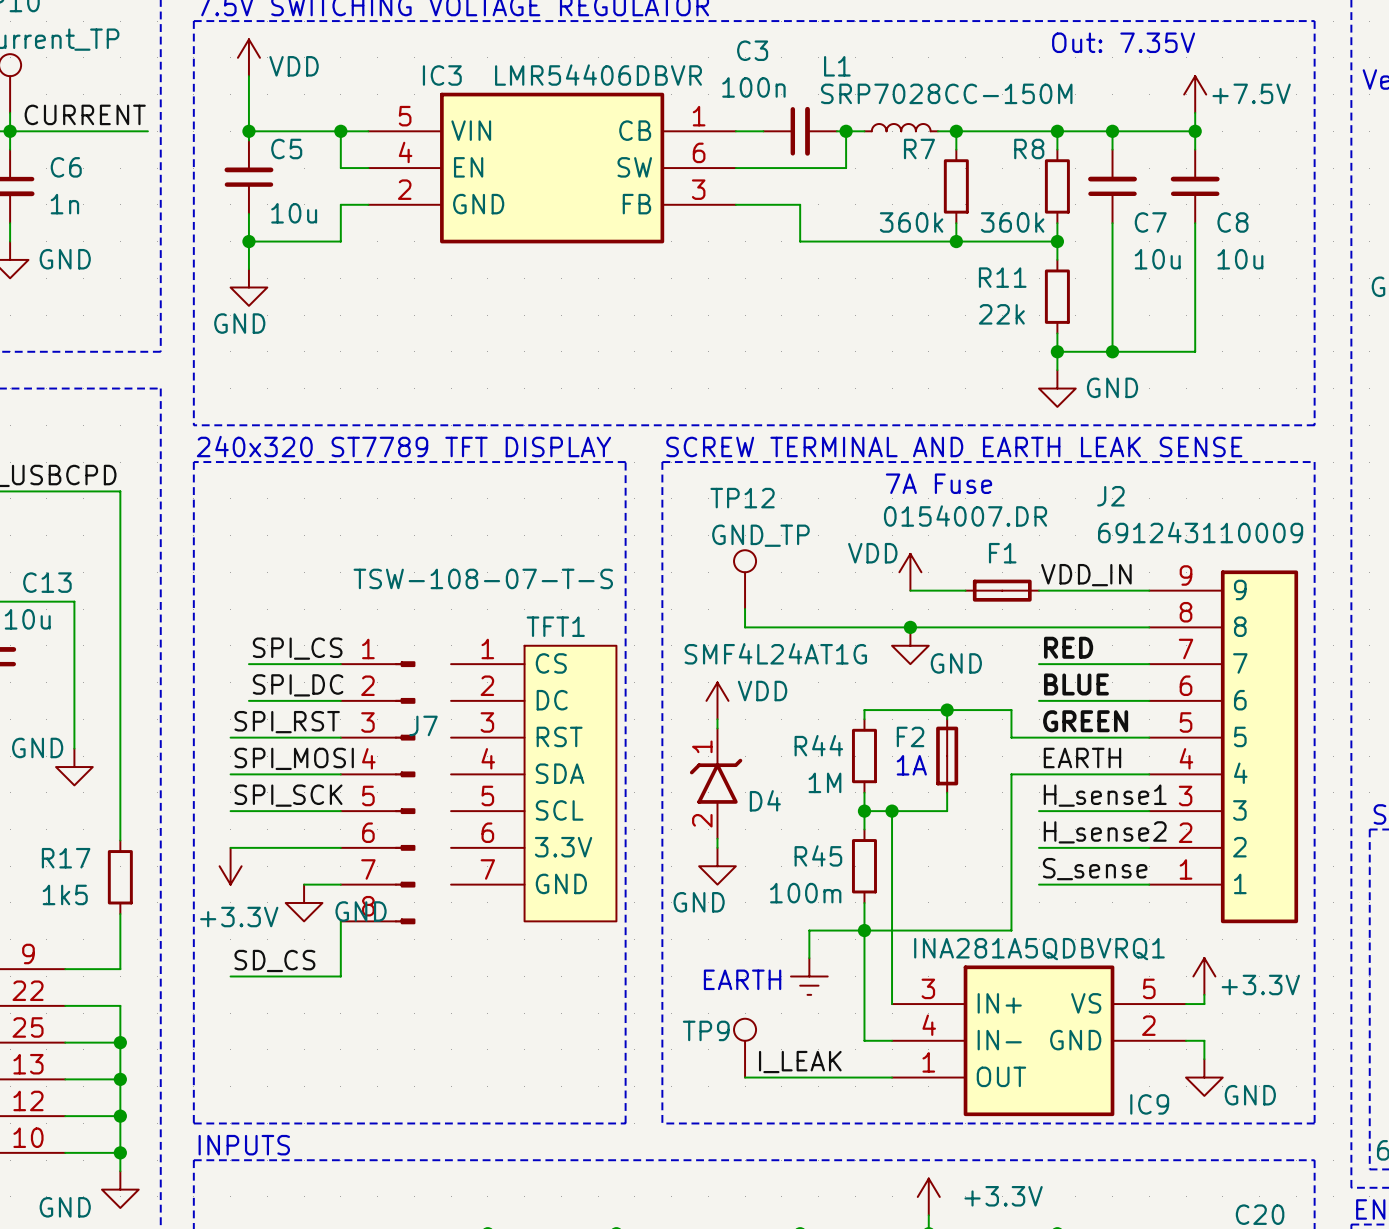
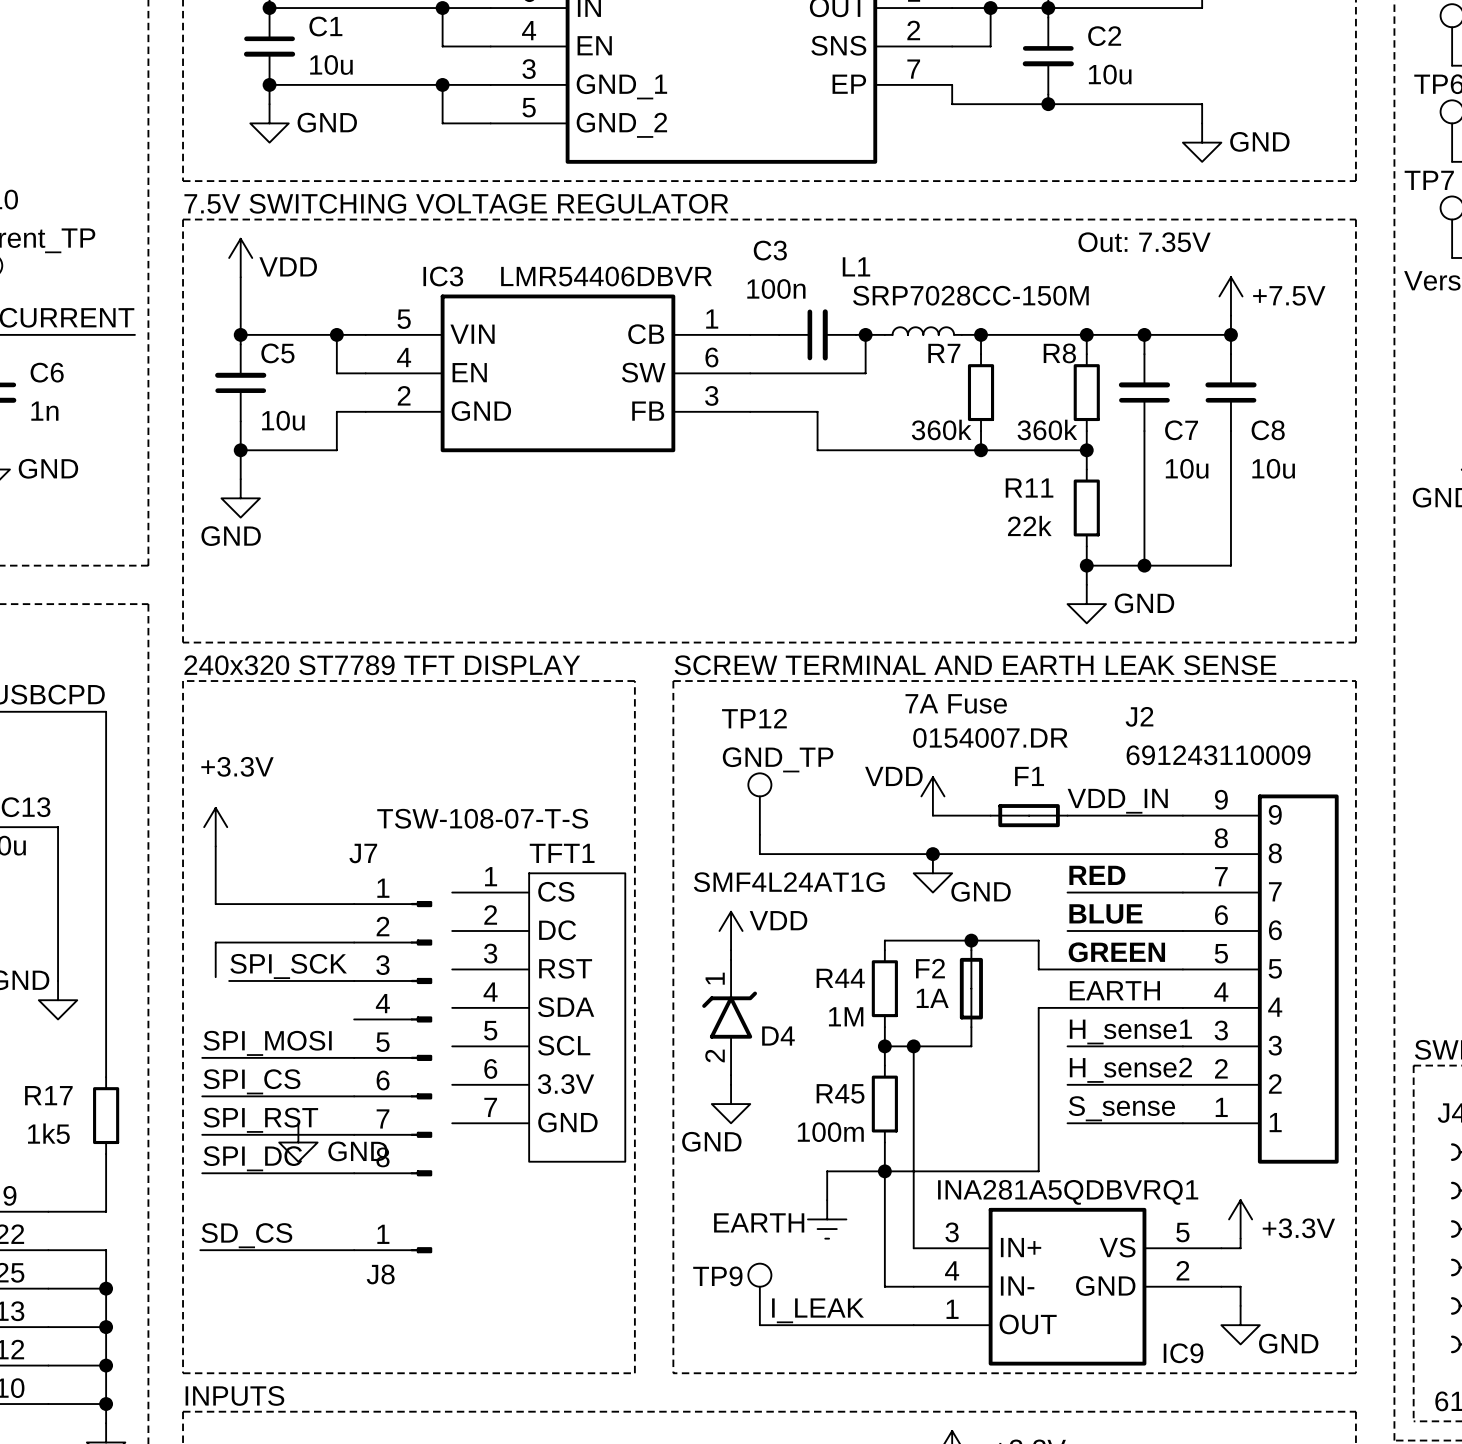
J7 value position: TSW-108-07-T-S (483, 578) -> TSW-108-07-T-S (482, 818)
wire: none -> (215, 846) (215, 904) (354, 904)
label position: SPI_CS (297, 648) -> SPI_CS (251, 1081)
wire: (248, 664) (340, 664) -> none
label position: SPI_DC (298, 685) -> SPI_DC (252, 1158)
wire: (248, 700) (340, 700) -> none
wire: none -> (354, 942) (215, 942) (215, 977)
label position: SPI_RST (287, 722) -> SPI_RST (260, 1120)
J7 name position: J7 (423, 725) -> J7 (363, 853)
wire: (230, 737) (340, 737) -> none
wire: none -> (229, 980) (354, 980)
label position: SPI_MOSI (294, 758) -> SPI_MOSI (267, 1043)
wire: (230, 774) (340, 774) -> none
J7 position: (378, 792) -> (393, 1038)
label position: SPI_SCK (288, 795) -> SPI_SCK (288, 966)
wire: (230, 811) (340, 811) -> none
wire: none -> (202, 1057) (354, 1057)
wire: (230, 847) (340, 847) -> none
wire: none -> (202, 1096) (354, 1096)
power symbol rotation: 0° (230, 866) -> 180° (215, 827)
power symbol position: +3.3V (230, 866) -> +3.3V (215, 827)
wire: (304, 884) (340, 884) -> none
wire: none -> (202, 1134) (354, 1134)
wire: (340, 921) (340, 976) (230, 976) -> none
wire: none -> (202, 1173) (354, 1173)
label position: SD_CS (274, 960) -> SD_CS (246, 1235)
wire: none -> (200, 1250) (354, 1250)
J8: none -> (393, 1250)

